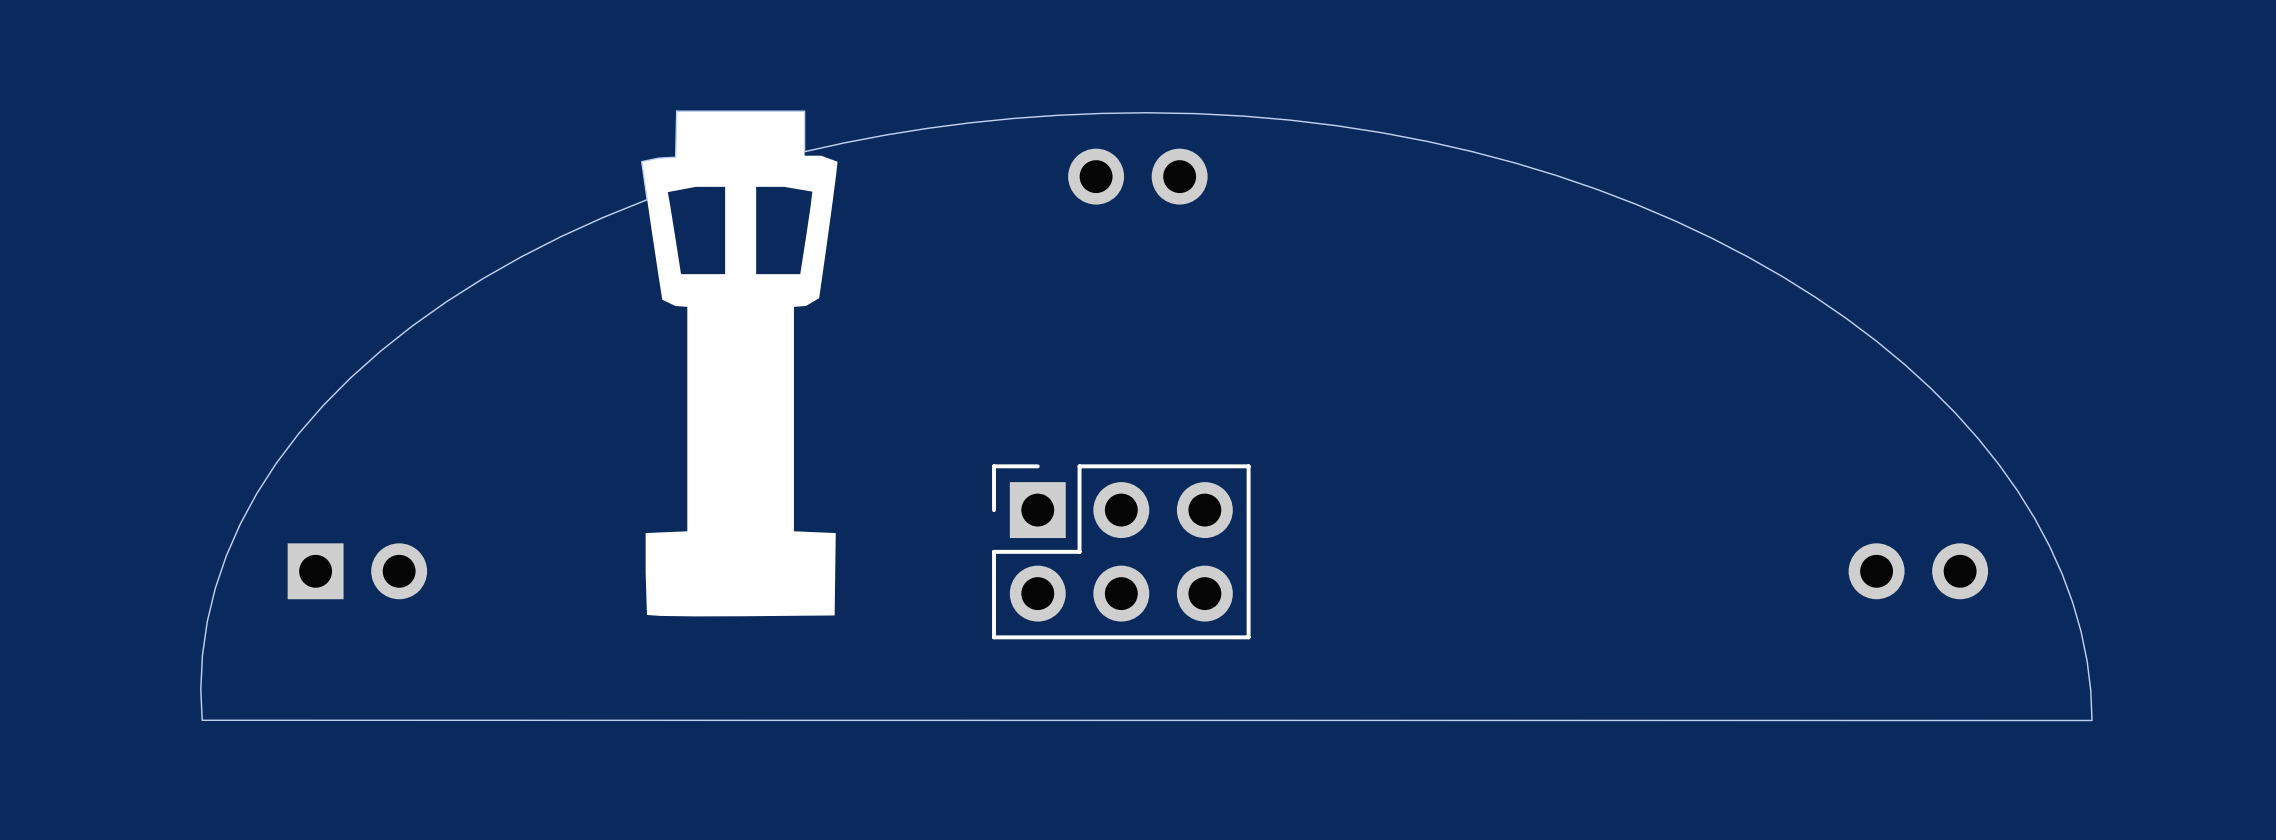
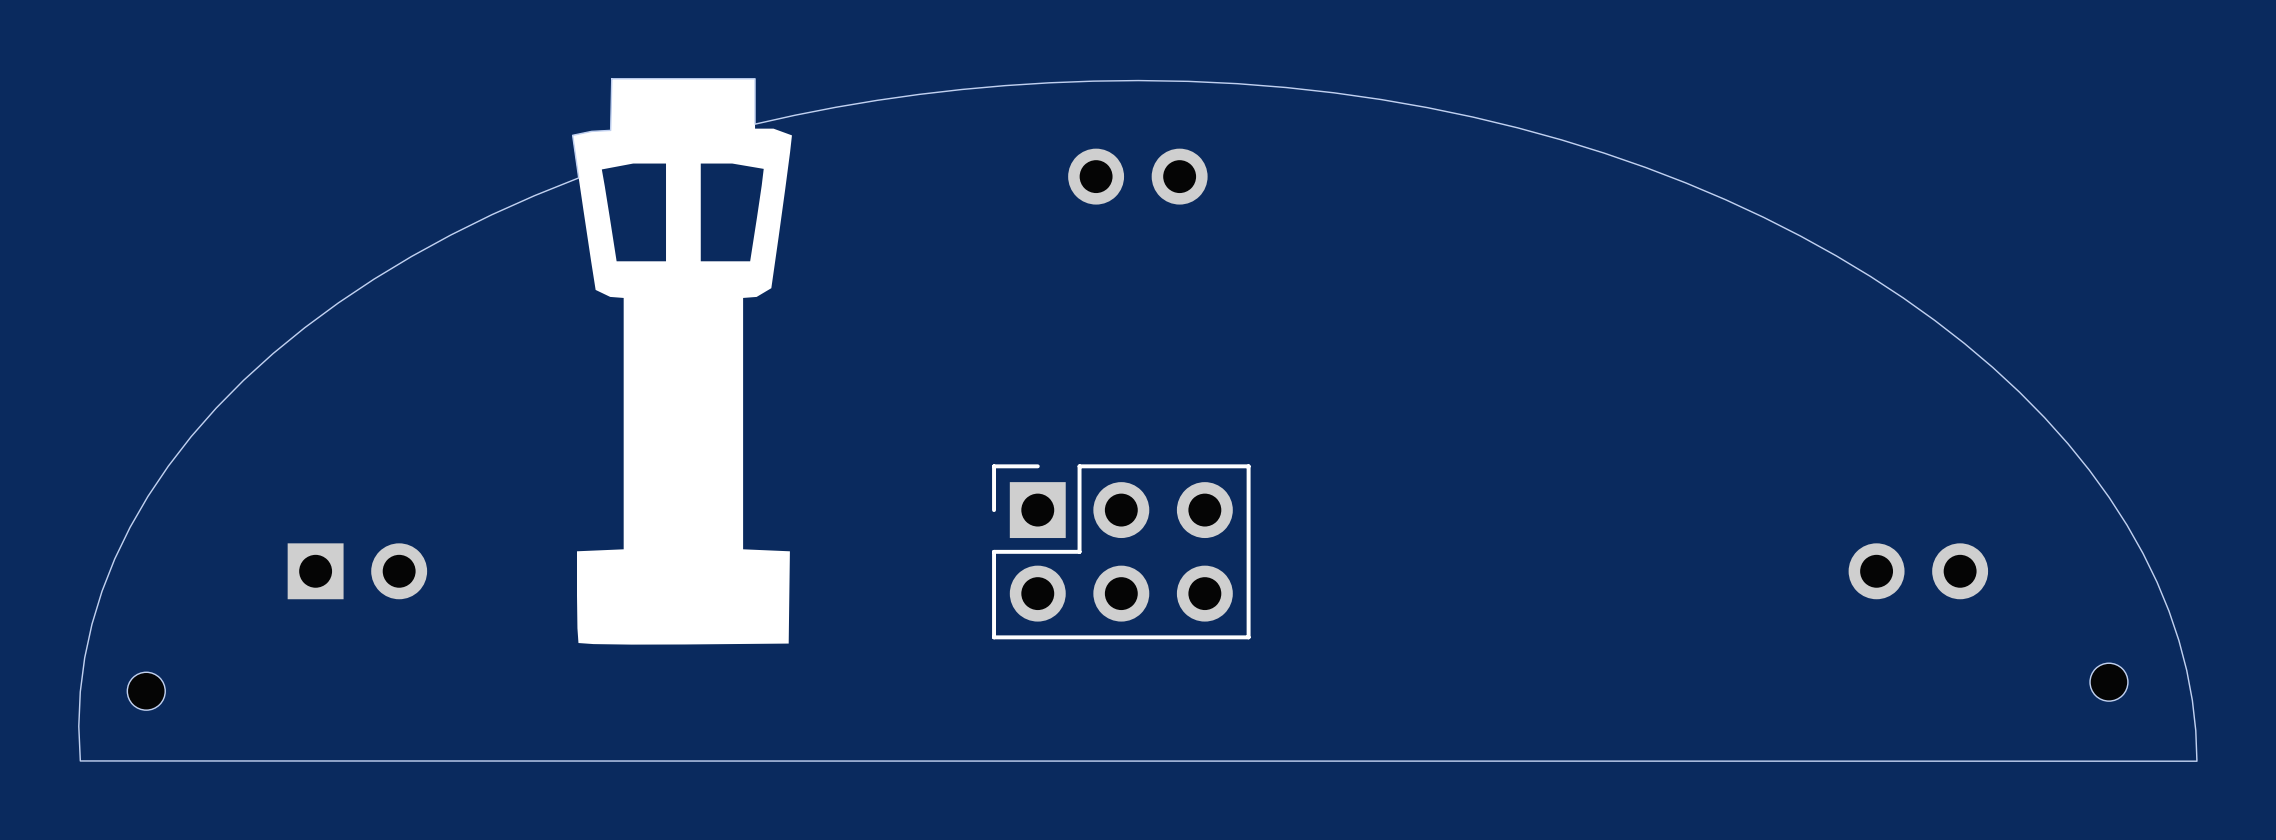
drawing shape: [200, 111, 2093, 721] -> [78, 78, 2197, 762]
part: none -> (2108, 682)
part: none -> (146, 691)

